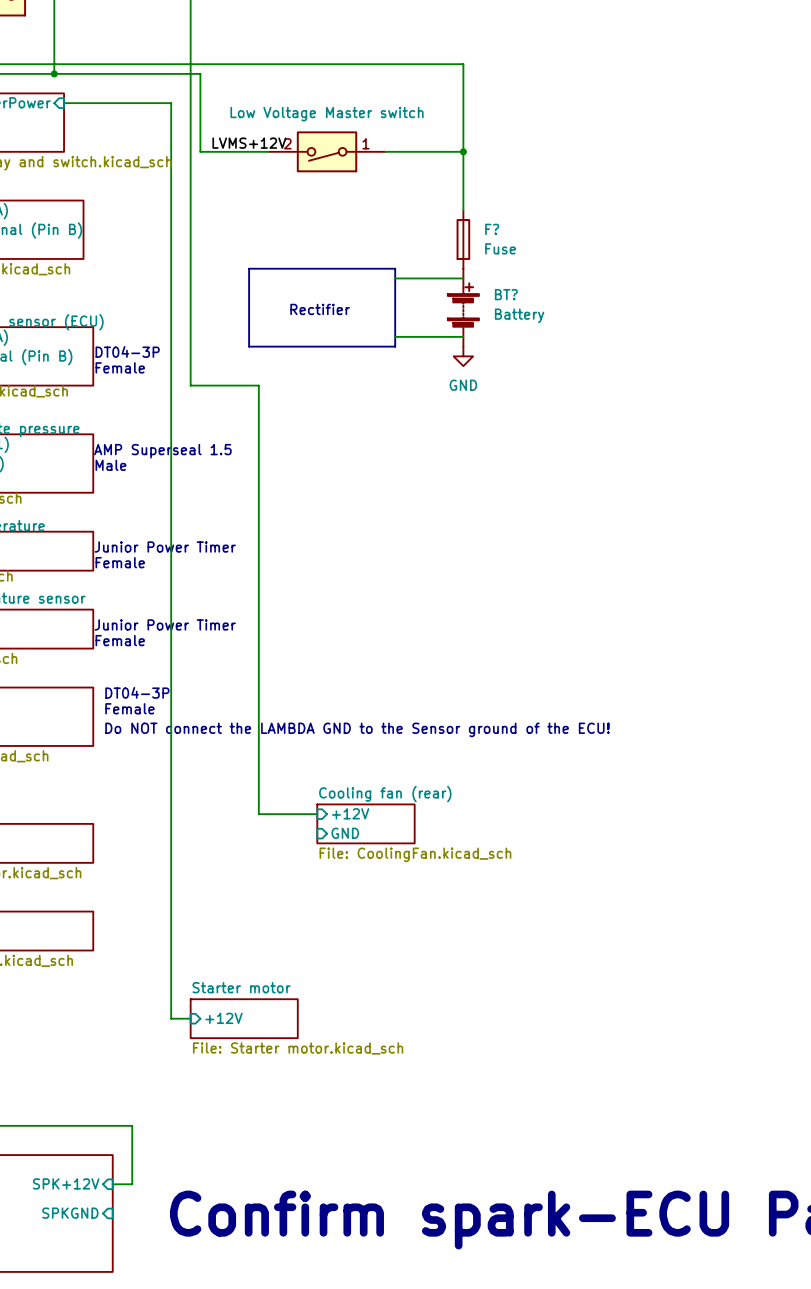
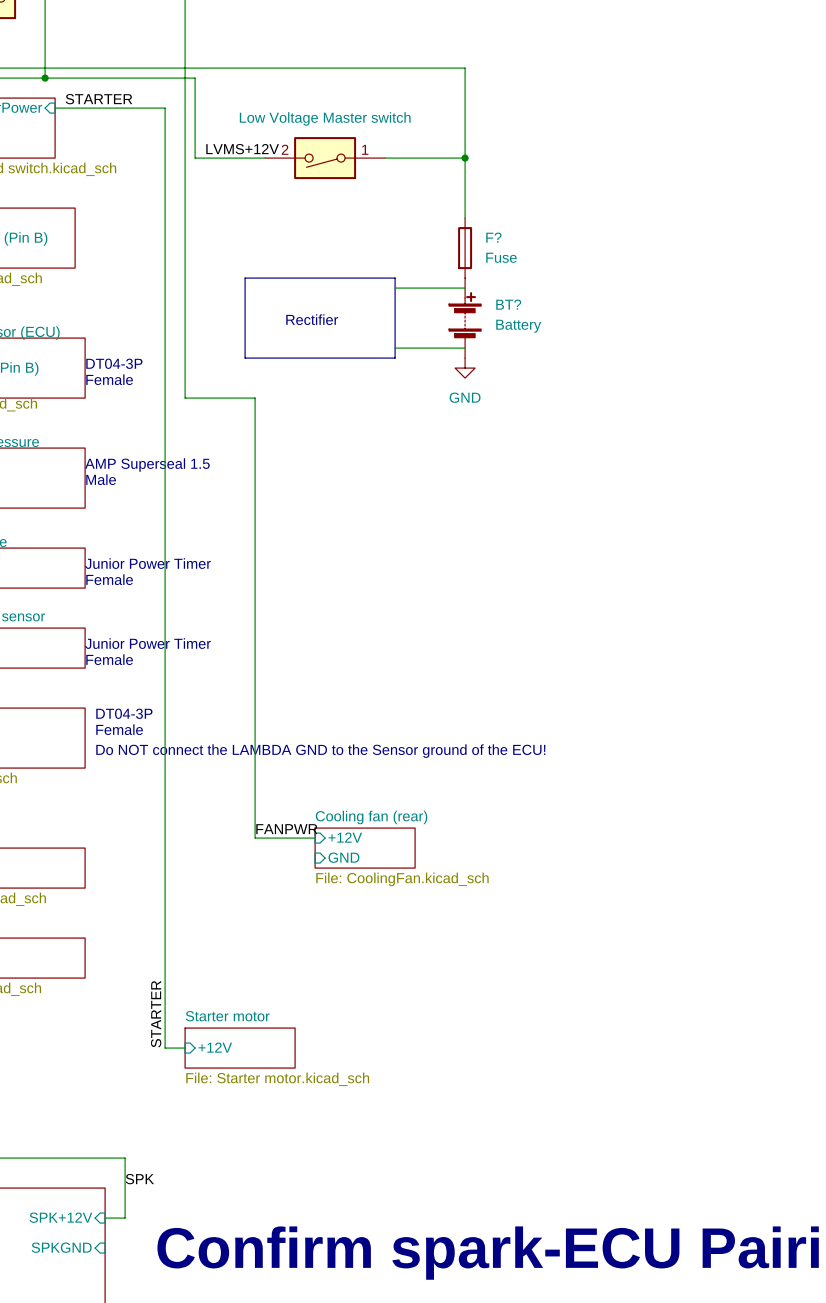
label: none -> STARTER (99, 99)
label: none -> FANPWR (286, 829)
label: none -> STARTER (156, 1014)
label: none -> SPK (139, 1179)

